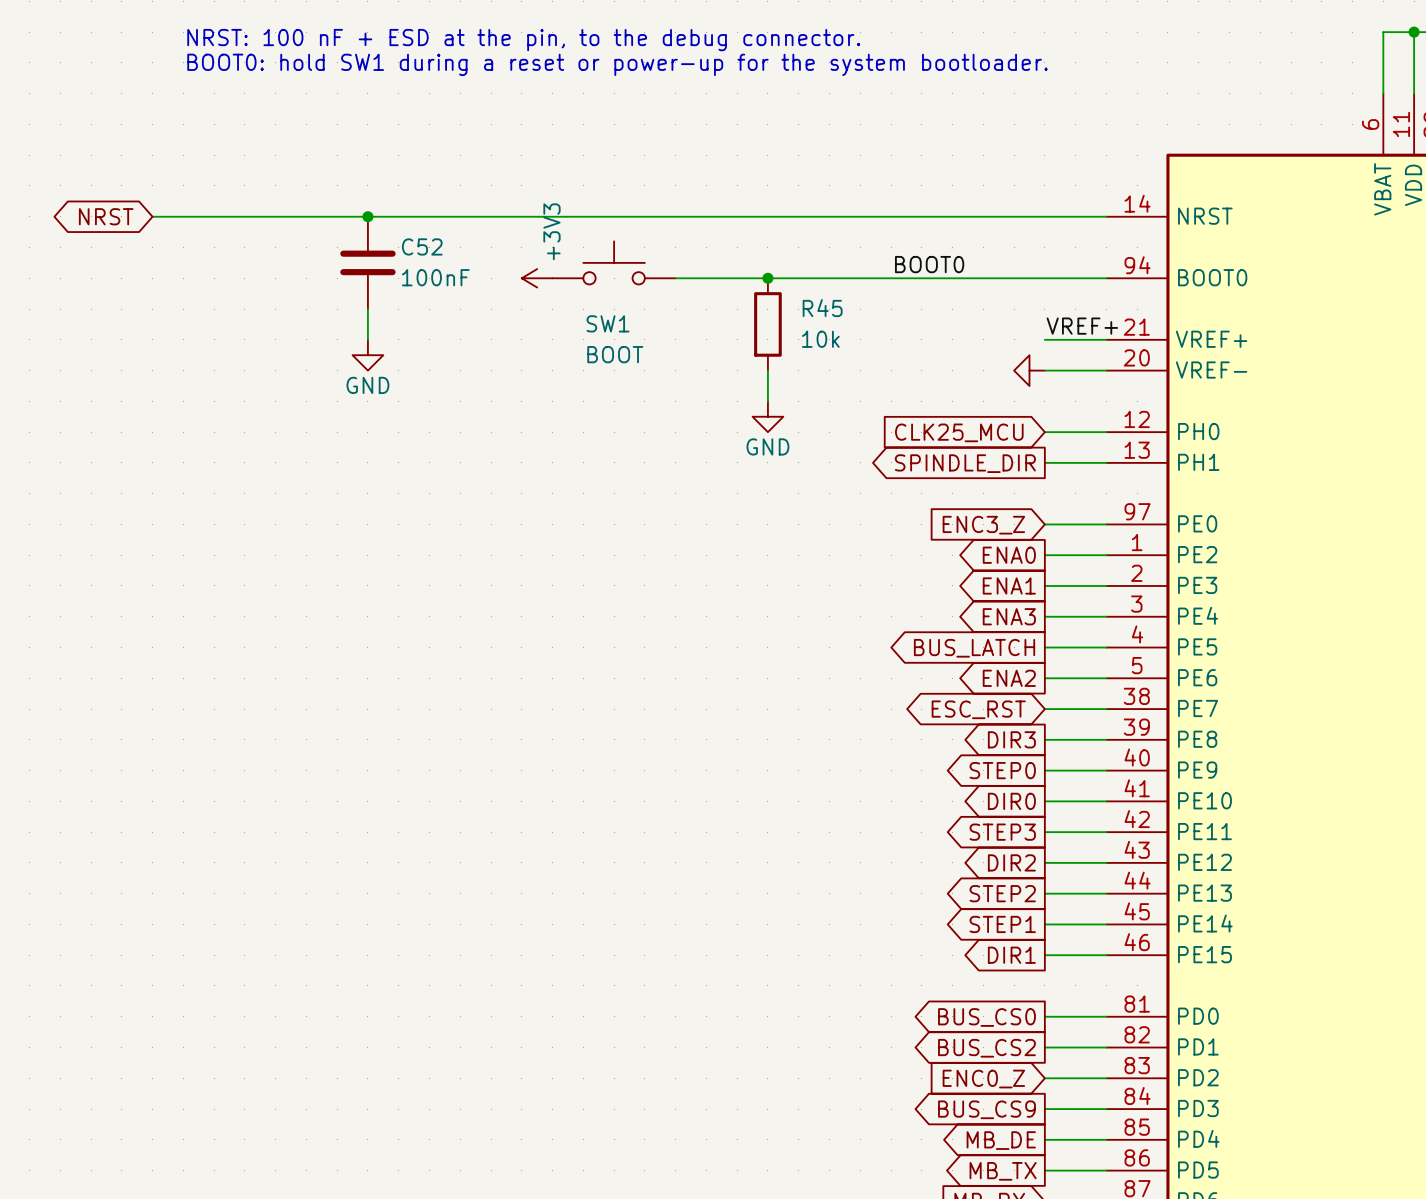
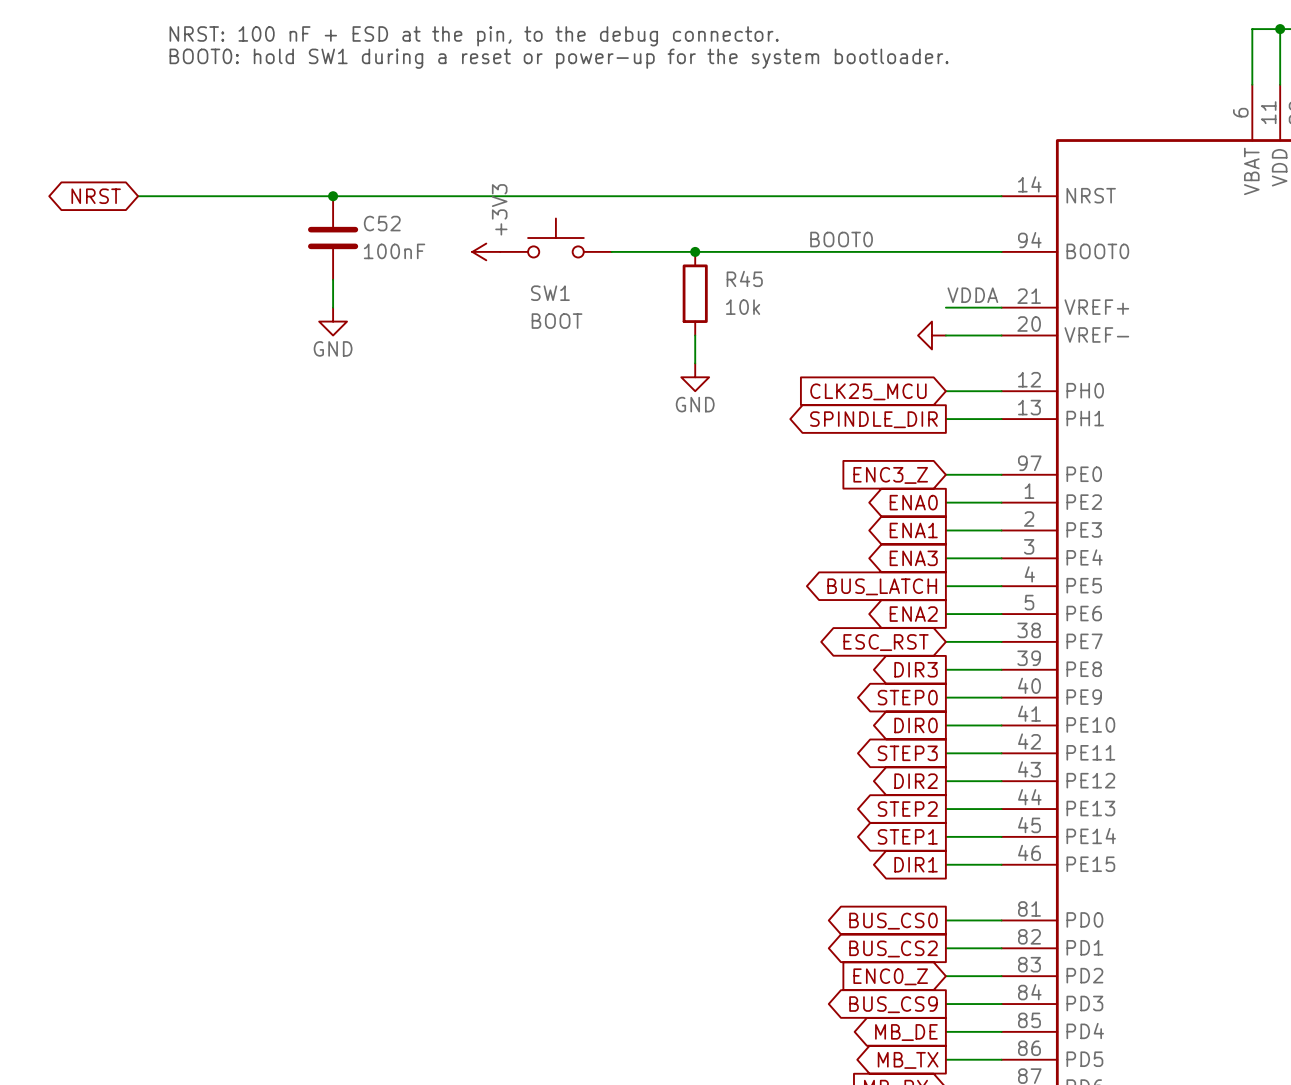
label: VREF+ (1082, 326) -> VDDA (972, 295)

